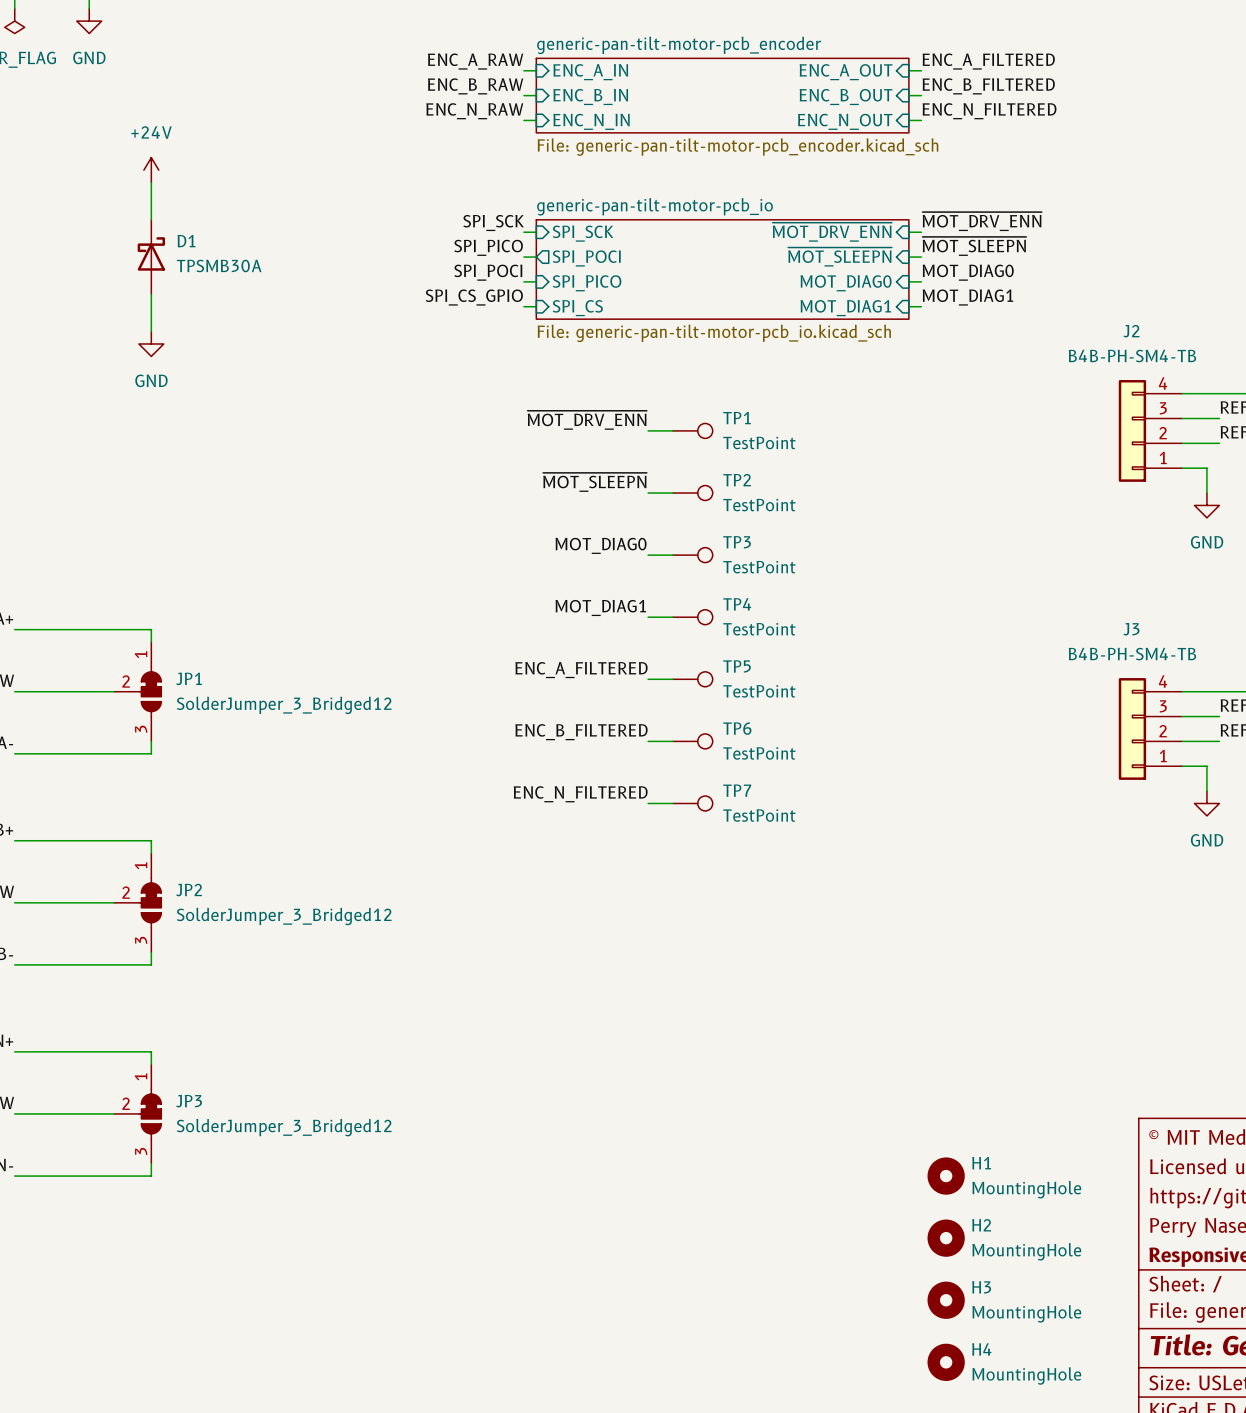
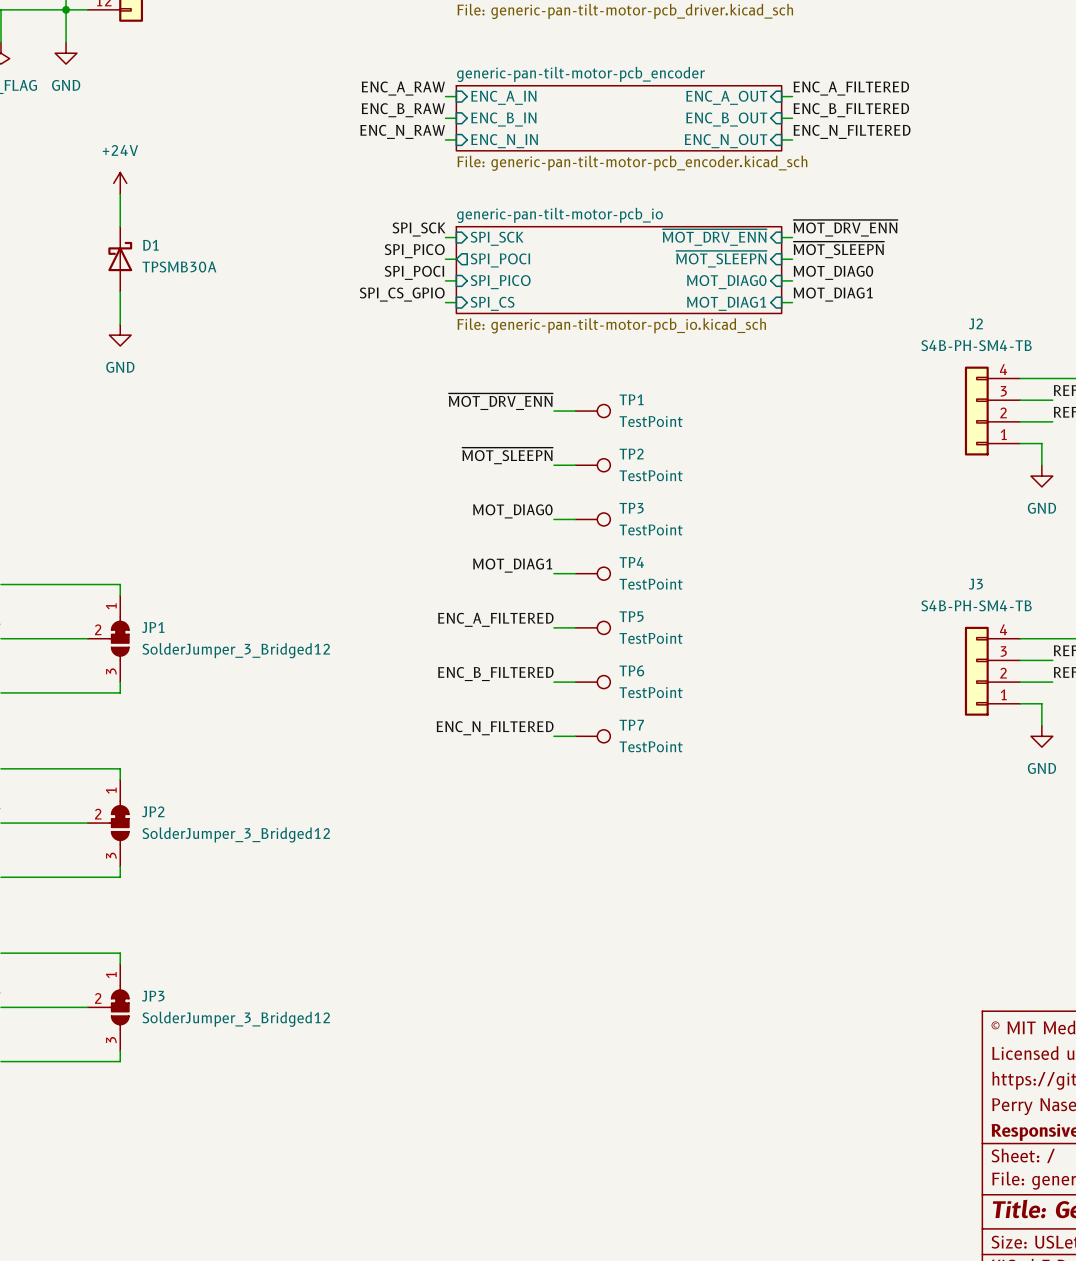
J2 value: B4B-PH-SM4-TB (1132, 356) -> S4B-PH-SM4-TB (976, 345)
J3 value: B4B-PH-SM4-TB (1132, 654) -> S4B-PH-SM4-TB (976, 605)
H1: MountingHole (946, 1176) -> none
H2: MountingHole (946, 1238) -> none
H3: MountingHole (946, 1300) -> none
H4: MountingHole (946, 1362) -> none

